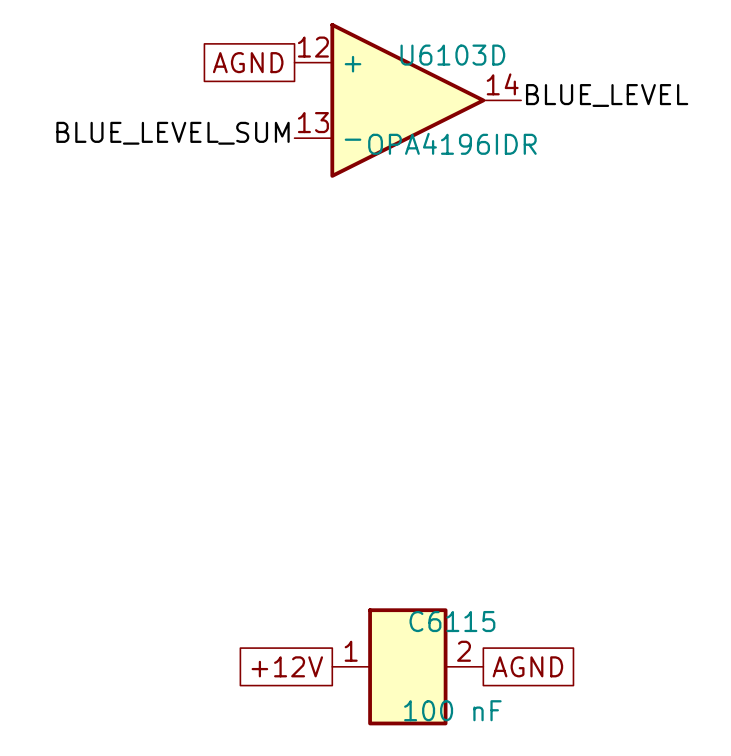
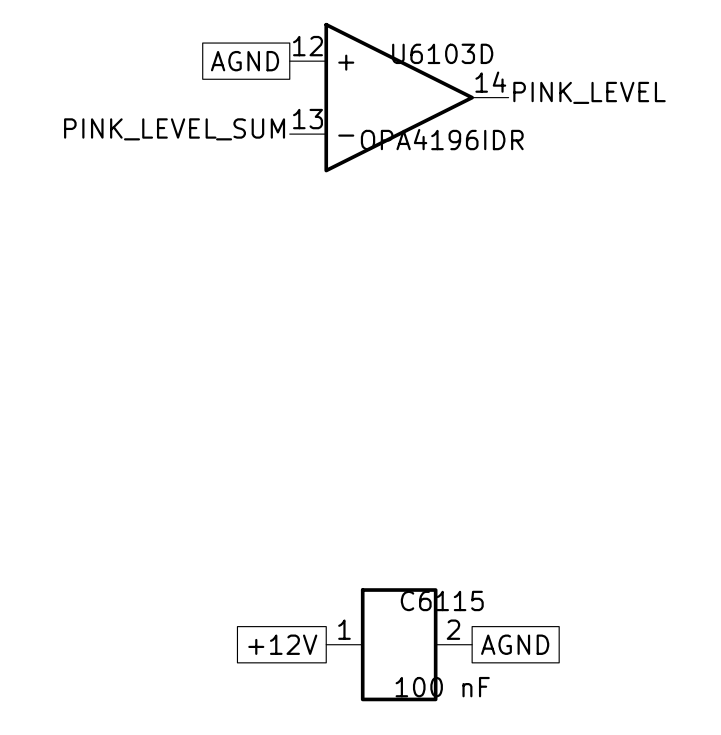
label: BLUE_LEVEL (607, 95) -> PINK_LEVEL (589, 92)
label: BLUE_LEVEL_SUM (173, 133) -> PINK_LEVEL_SUM (174, 129)

